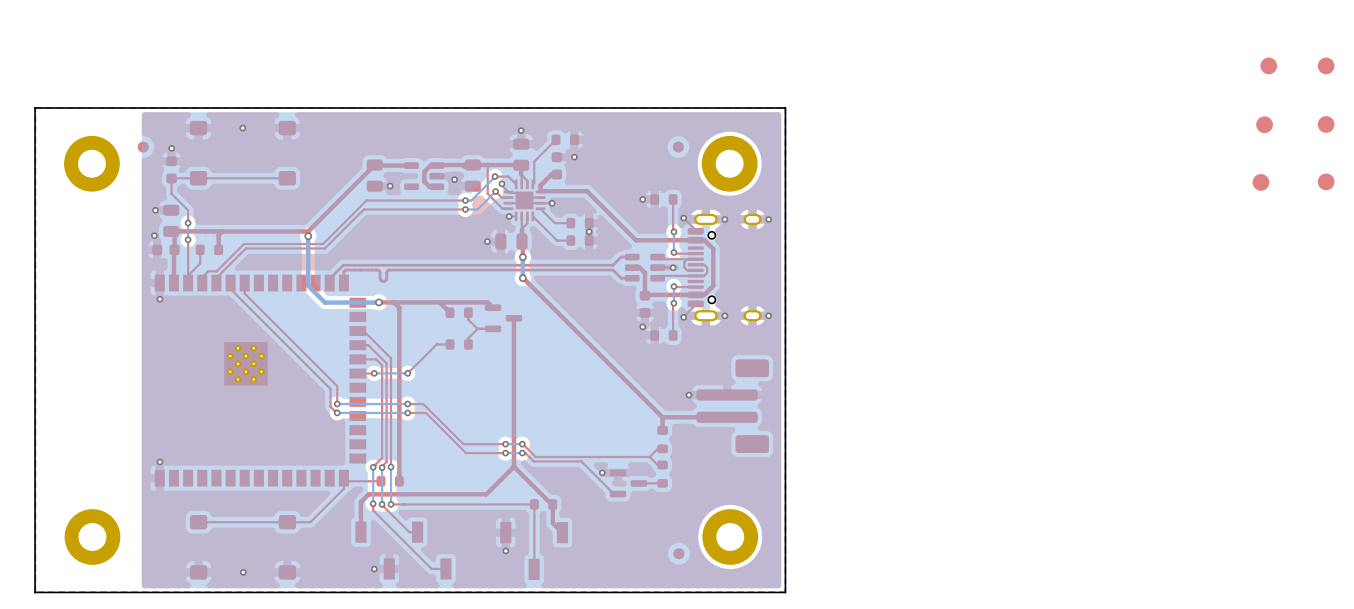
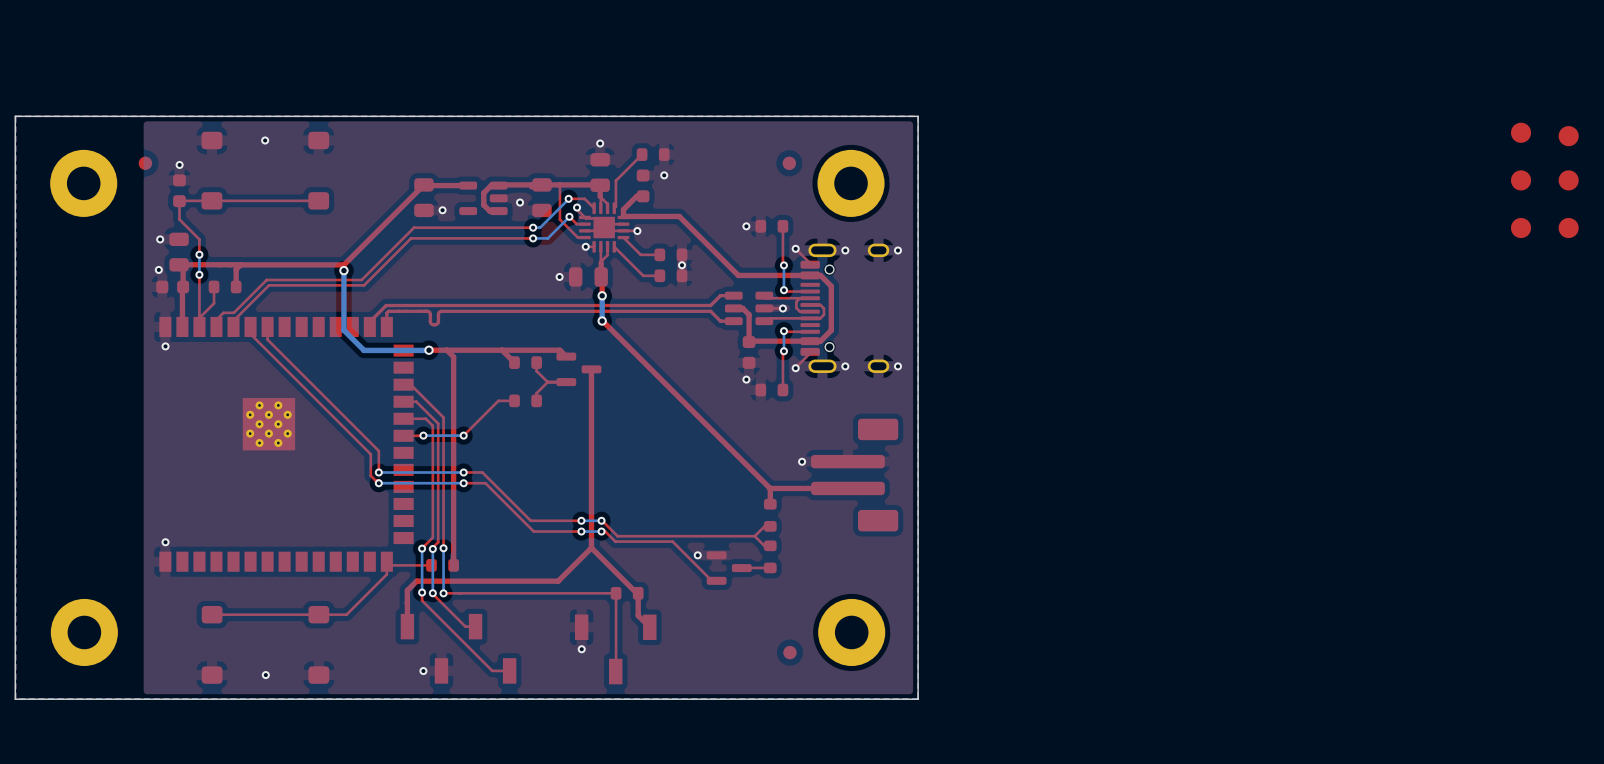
part: (1268, 65) -> none
part: (1326, 65) -> none
part: none -> (1521, 132)
part: (1264, 124) -> none
part: none -> (1521, 180)
part: none -> (1568, 180)
part: (1326, 181) -> none
part: (1260, 182) -> none
part: none -> (1521, 228)
part: none -> (1568, 228)

